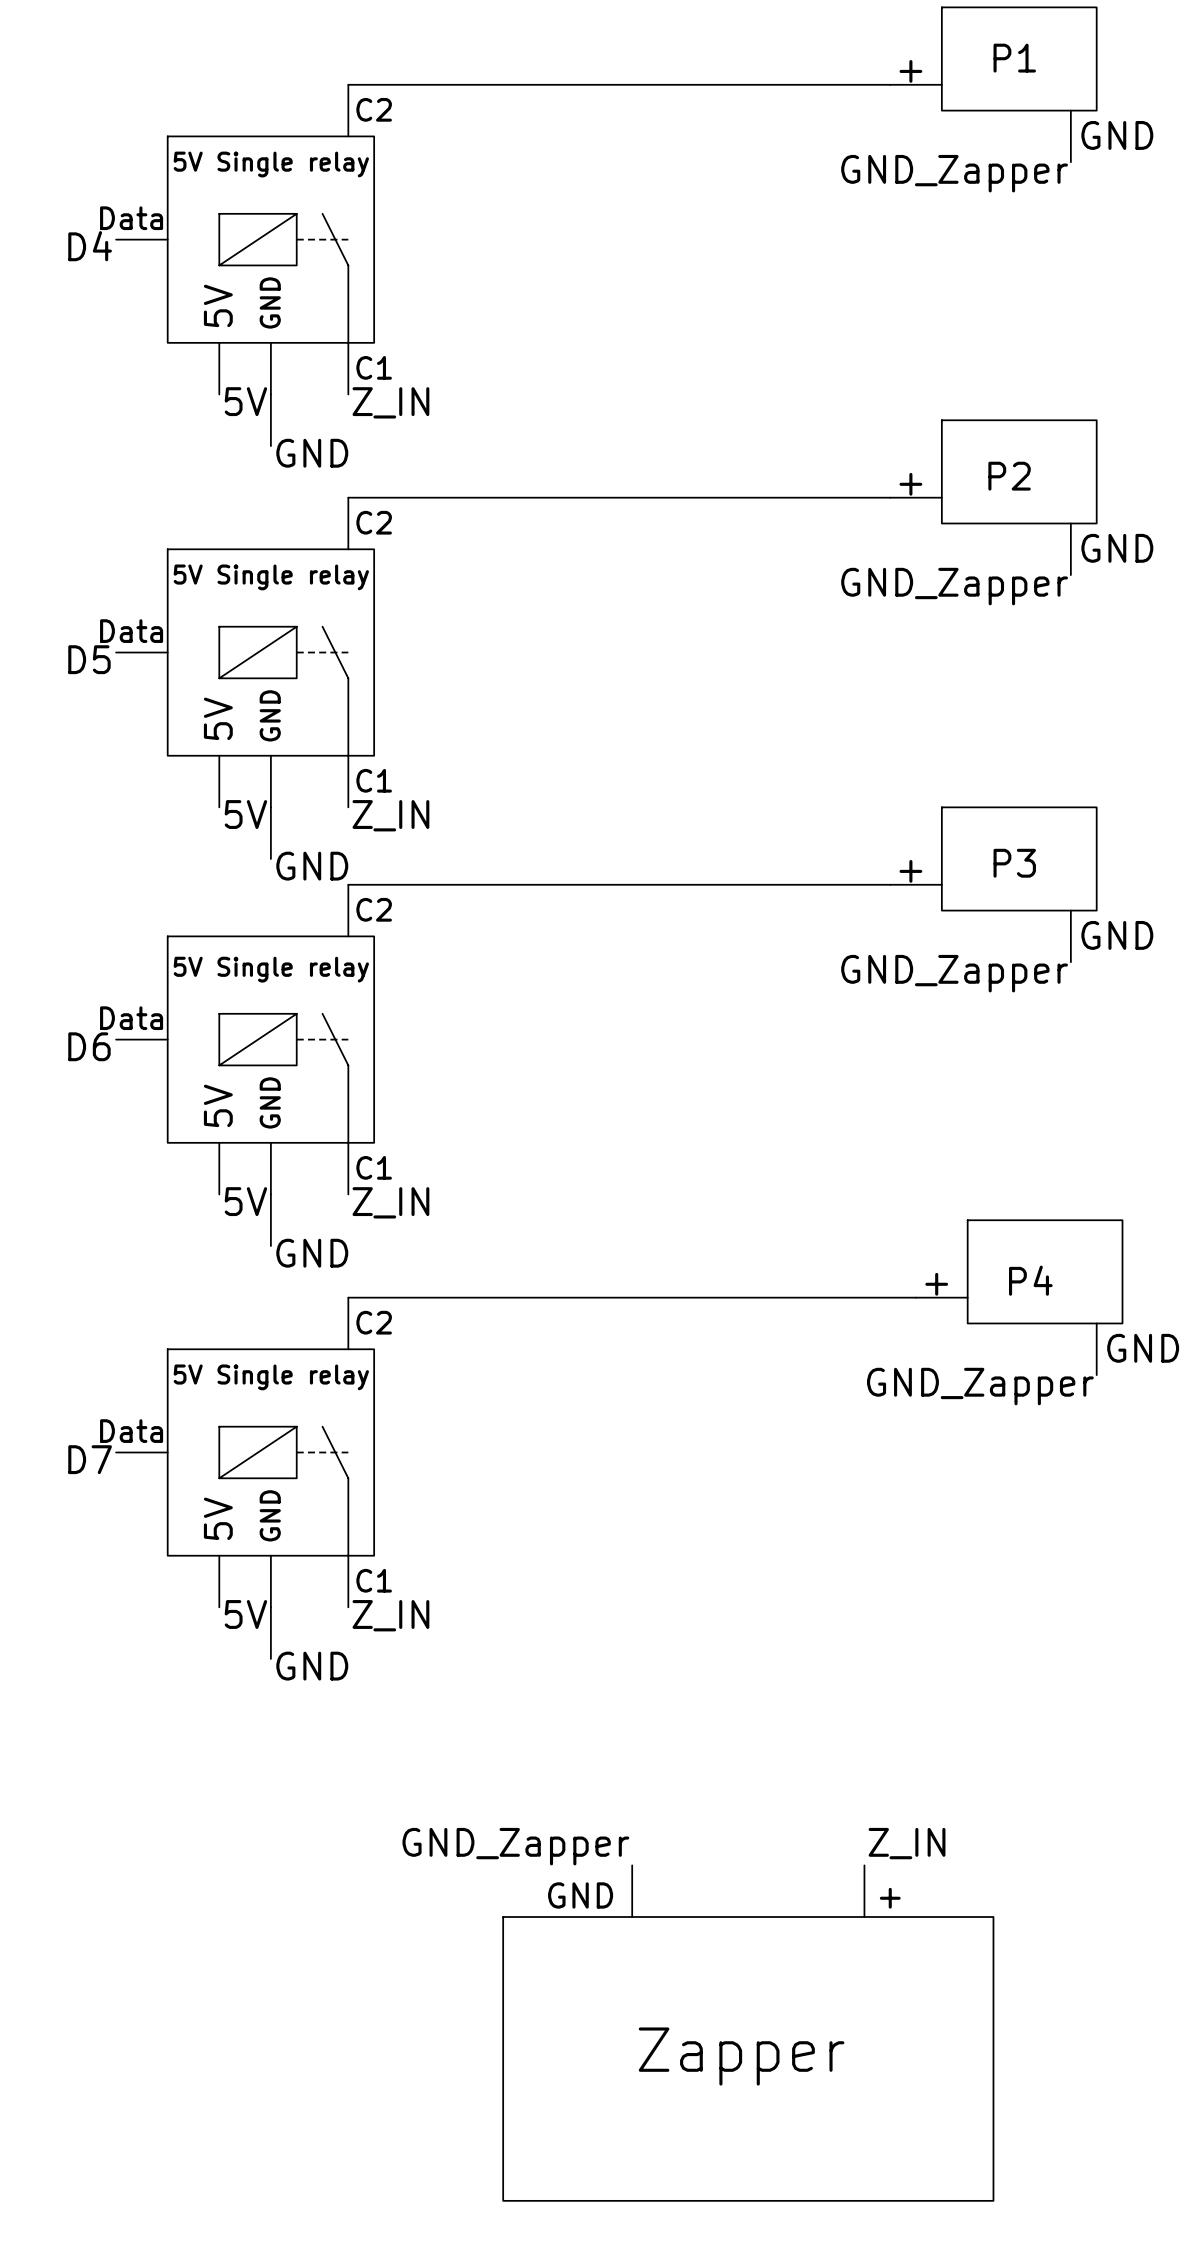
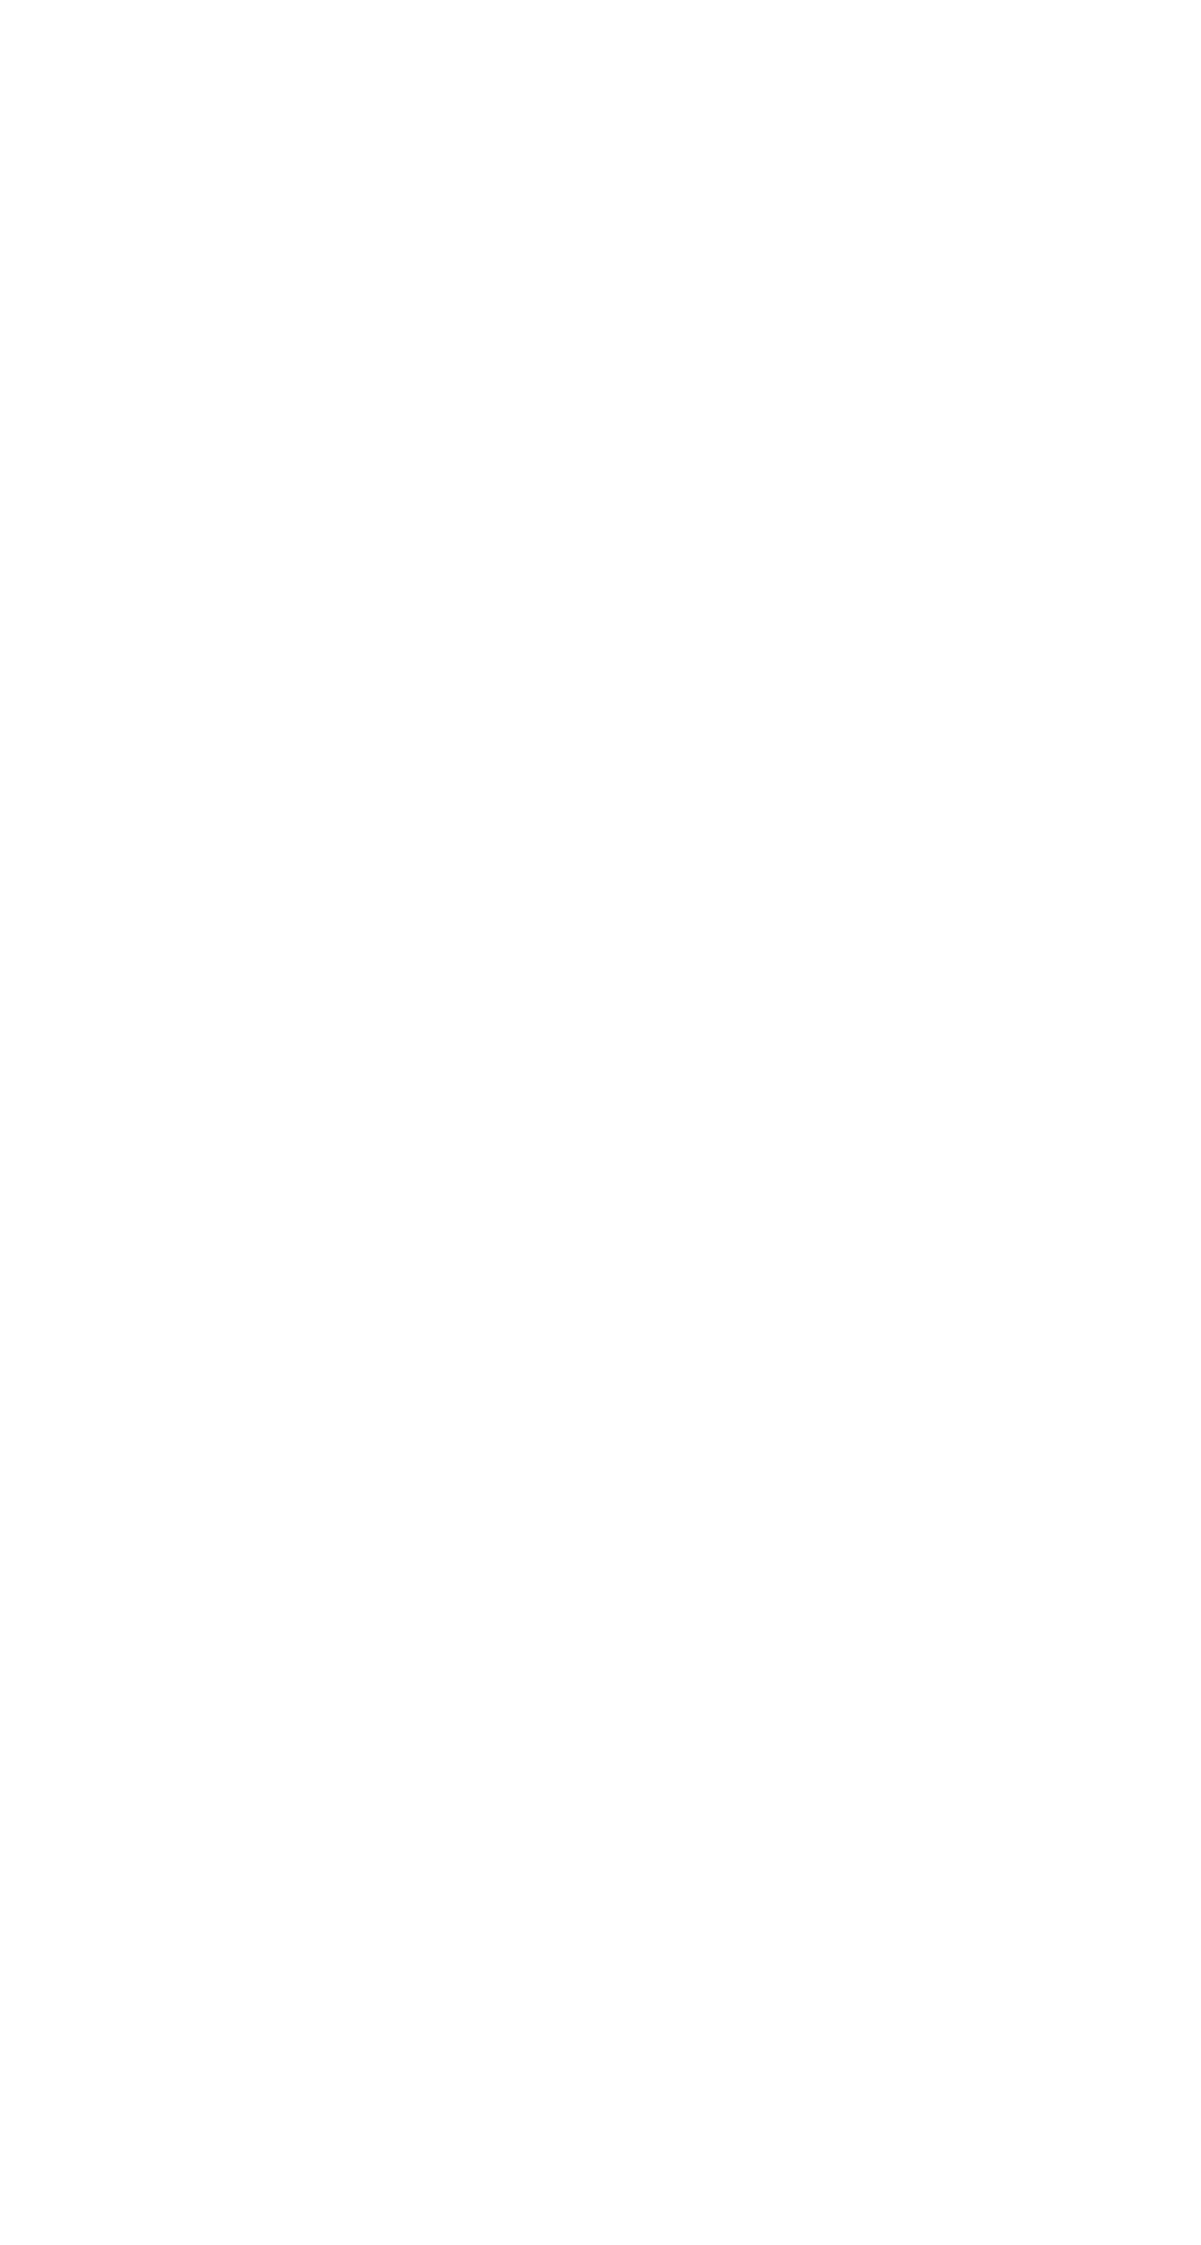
text: P1 (1014, 58) -> none
wire: (348, 84) (890, 84) -> none
part: (993, 84) -> none
text: 5V Single relay (271, 164) -> none
label: GND_Zapper (954, 173) -> none
part: (245, 239) -> none
label: D4 (90, 246) -> none
wire: (270, 394) (270, 446) -> none
label: 5V (245, 401) -> none
label: Z_IN (390, 402) -> none
label: GND (312, 453) -> none
text: P2 (1009, 476) -> none
wire: (348, 497) (890, 497) -> none
part: (993, 497) -> none
text: 5V Single relay (271, 577) -> none
label: GND_Zapper (954, 586) -> none
part: (245, 652) -> none
label: D5 (89, 659) -> none
wire: (270, 807) (270, 858) -> none
label: 5V (245, 814) -> none
label: Z_IN (390, 815) -> none
text: P3 (1014, 863) -> none
label: GND (312, 866) -> none
wire: (348, 884) (890, 884) -> none
part: (993, 884) -> none
text: 5V Single relay (271, 969) -> none
label: GND_Zapper (954, 973) -> none
part: (245, 1039) -> none
label: D6 (89, 1046) -> none
wire: (270, 1194) (270, 1246) -> none
label: 5V (245, 1201) -> none
label: Z_IN (390, 1202) -> none
label: GND (312, 1253) -> none
text: P4 (1030, 1280) -> none
wire: (348, 1297) (916, 1297) -> none
part: (1019, 1297) -> none
text: 5V Single relay (271, 1377) -> none
label: GND_Zapper (980, 1386) -> none
part: (245, 1452) -> none
label: D7 (90, 1459) -> none
wire: (270, 1607) (270, 1658) -> none
label: 5V (245, 1614) -> none
label: Z_IN (390, 1615) -> none
label: GND (312, 1666) -> none
label: Z_IN (907, 1843) -> none
label: GND_Zapper (515, 1846) -> none
part: (748, 2033) -> none

